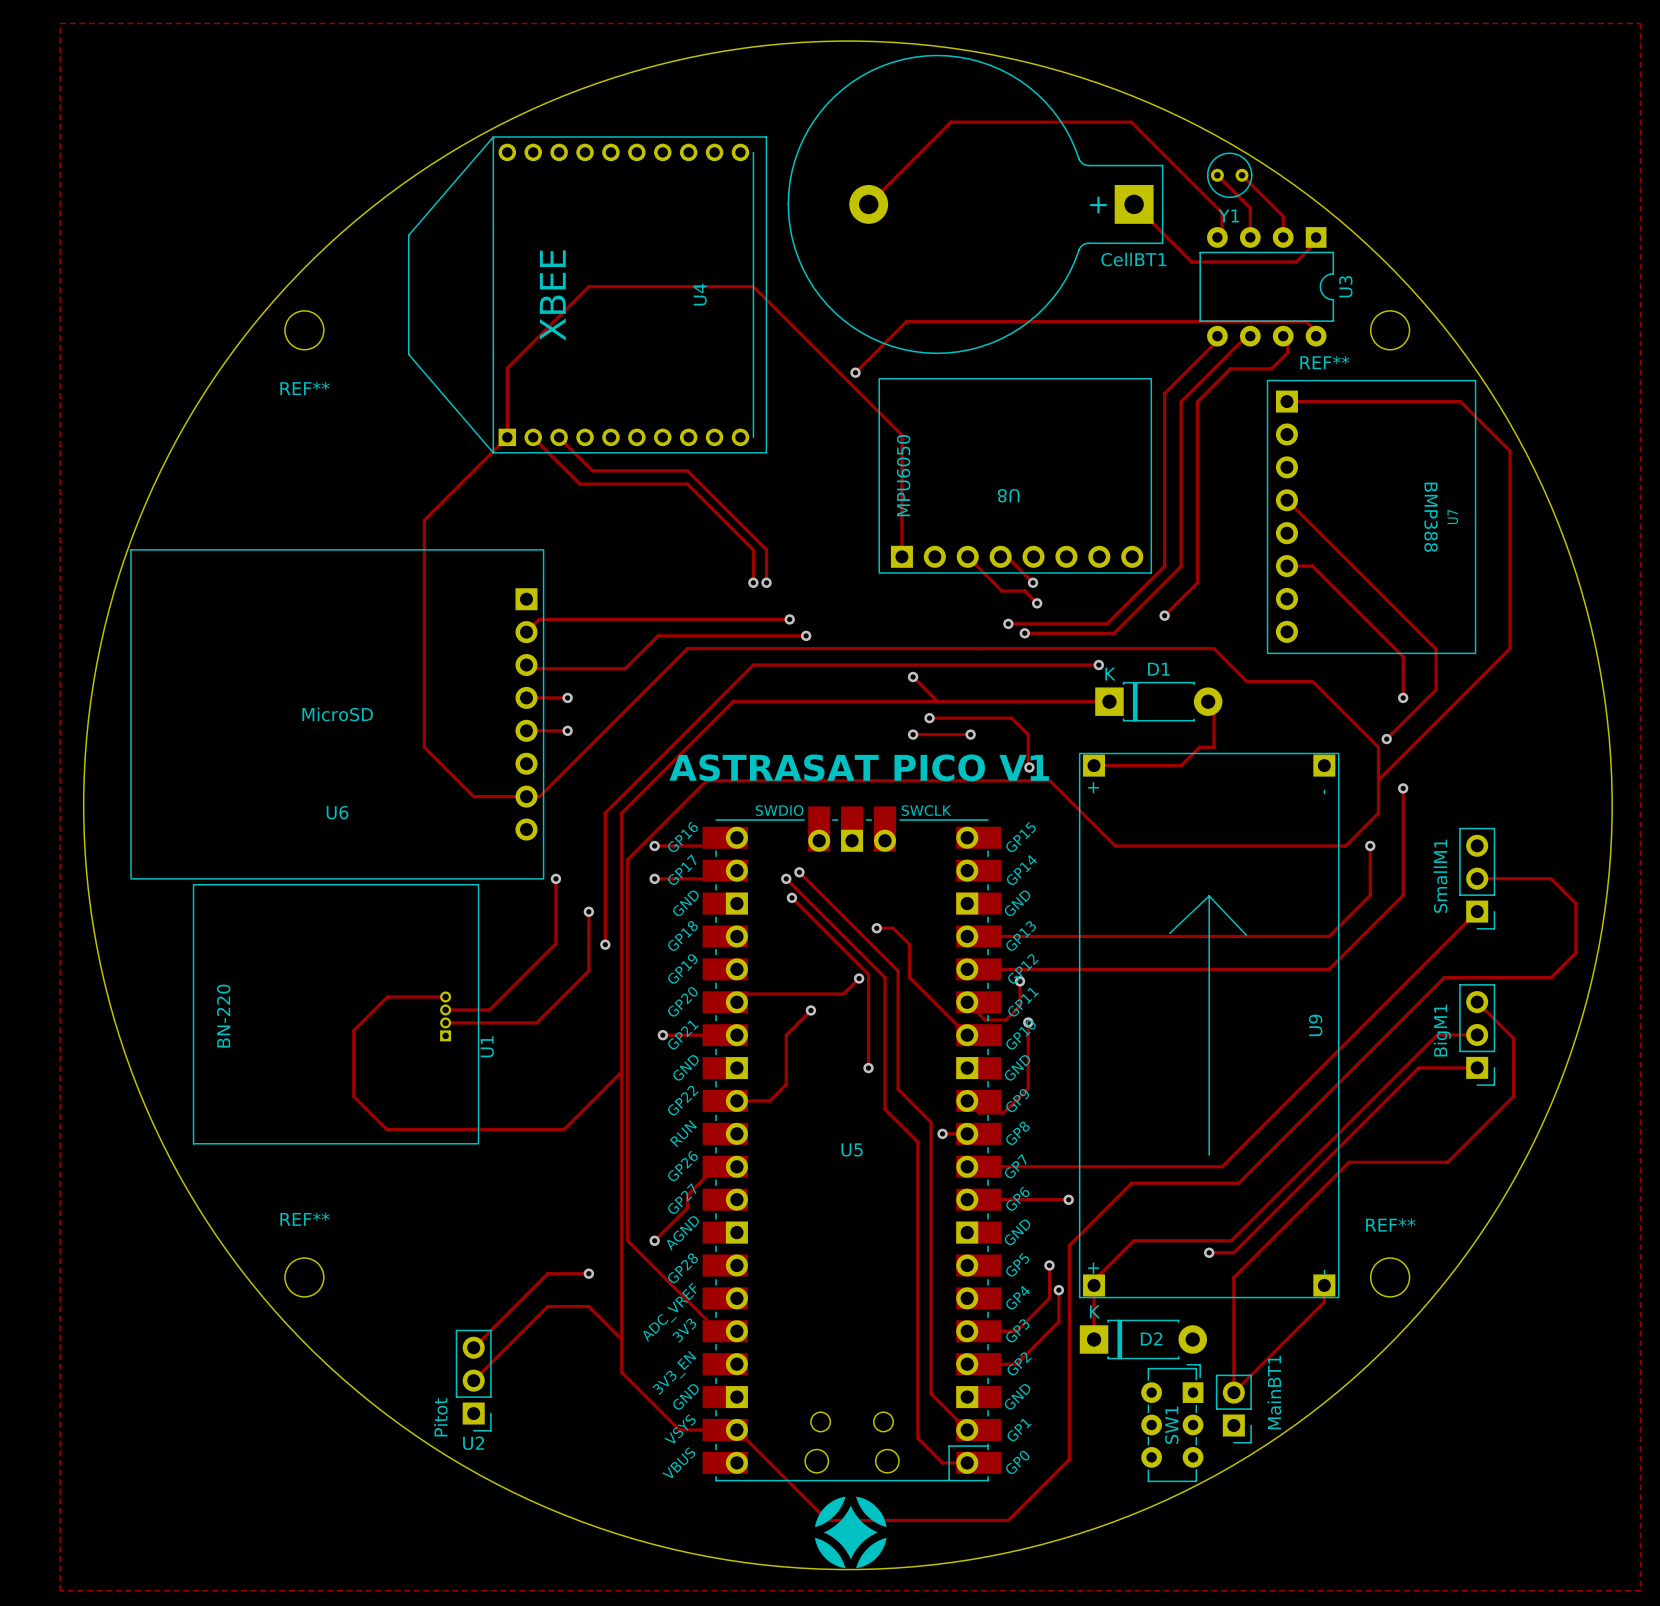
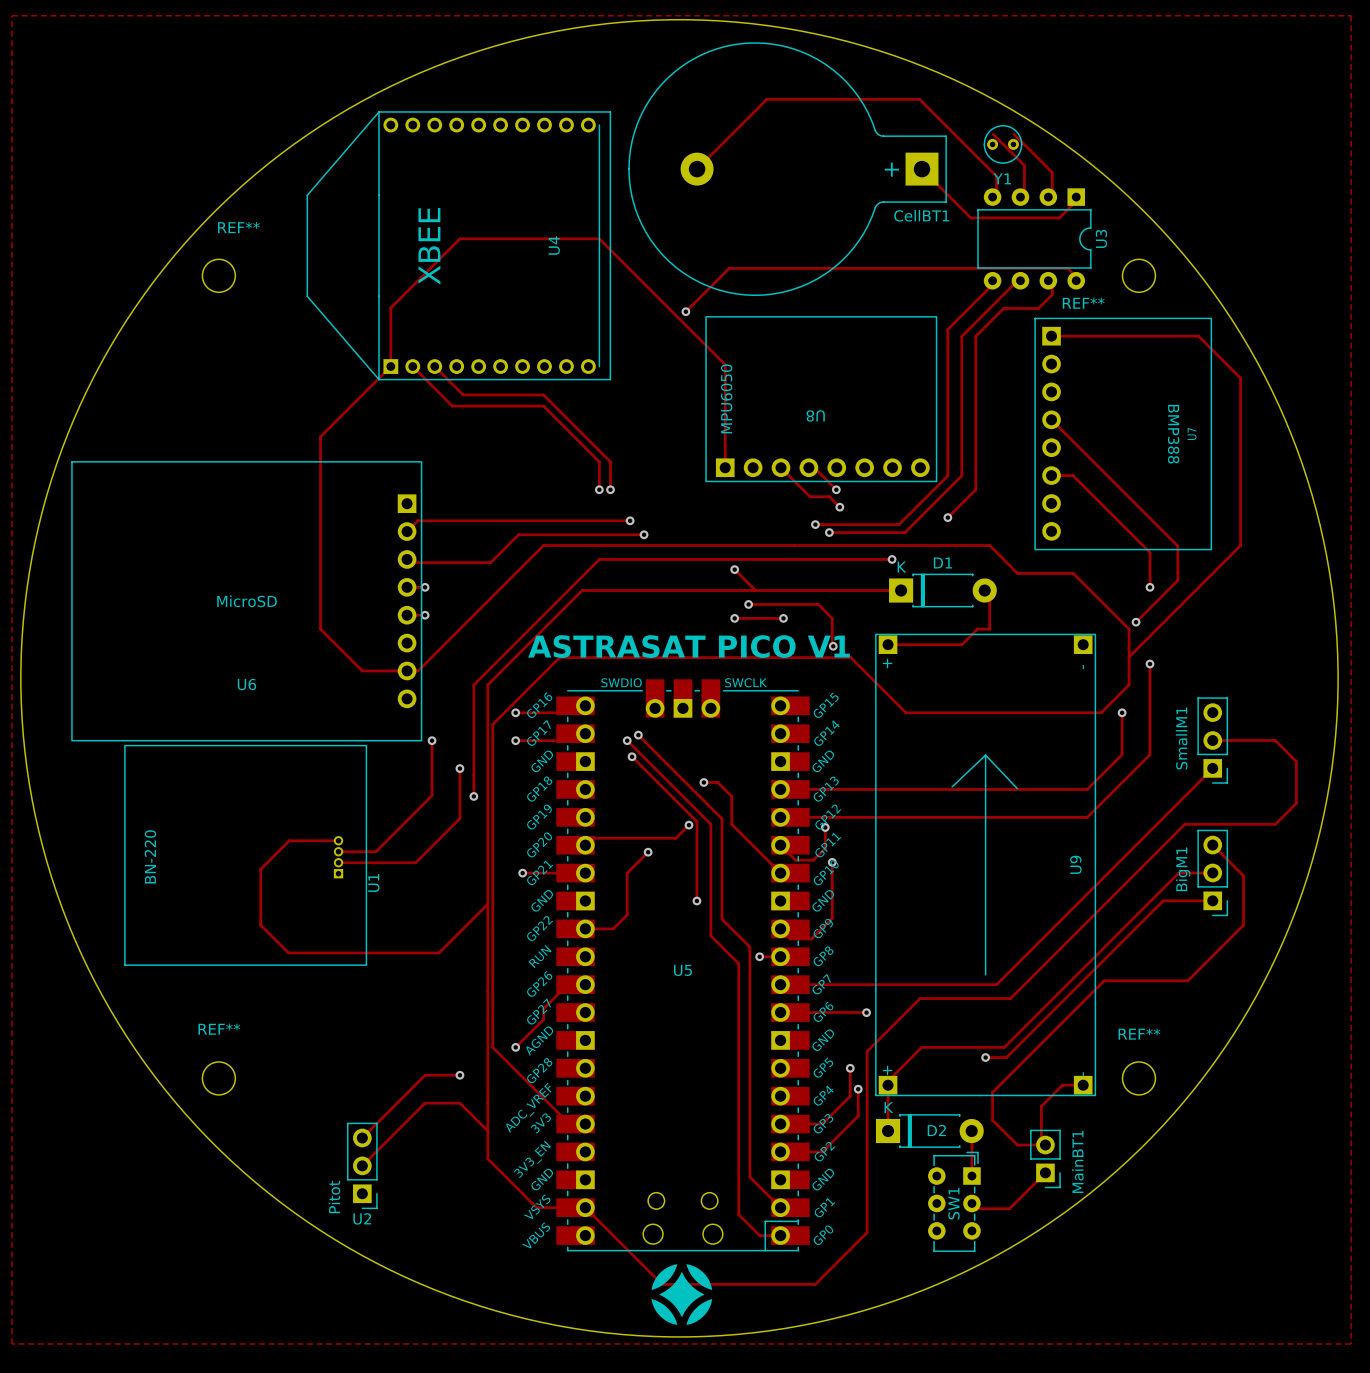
round board edge size: [83, 40, 1613, 1571] -> [20, 19, 1339, 1338]
track: none -> (993, 134) (1024, 165) (1024, 197)
track: none -> (1014, 134) (1052, 172) (1052, 197)
track: (1217, 175) (1250, 208) (1250, 237) -> none
track: (1242, 175) (1283, 216) (1283, 237) -> none
REF** name position: REF** (305, 388) -> REF** (238, 227)
track: (547, 697) (567, 697) -> none
via: none -> (425, 587)
via: (567, 697) -> none
track: (547, 730) (567, 730) -> none
via: none -> (425, 615)
via: (567, 730) -> none
track: (1233, 1277) (1233, 1392) (1324, 1302) (1324, 1285) -> (1006, 1078) (992, 1092) (992, 1120) (1017, 1145) (1045, 1145)
track: none -> (1083, 1085) (1062, 1085) (1041, 1106) (1041, 1140) (1045, 1145)
track: none -> (971, 1131) (971, 1181)
track: none -> (1045, 1172) (1009, 1208) (971, 1208)
MainBT1 name position: MainBT1 (1274, 1392) -> MainBT1 (1077, 1161)
MainBT1 position: (1233, 1409) -> (1045, 1158)

